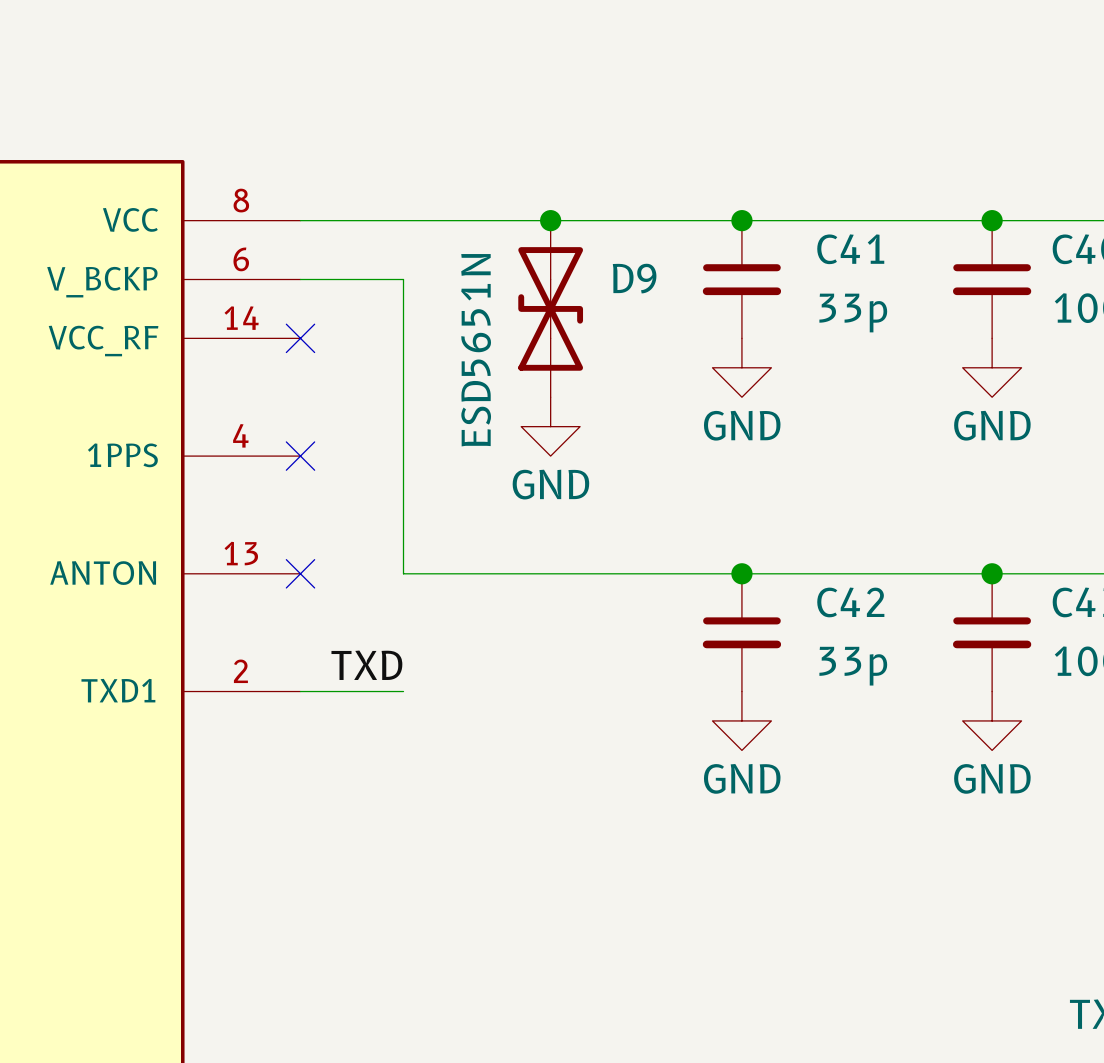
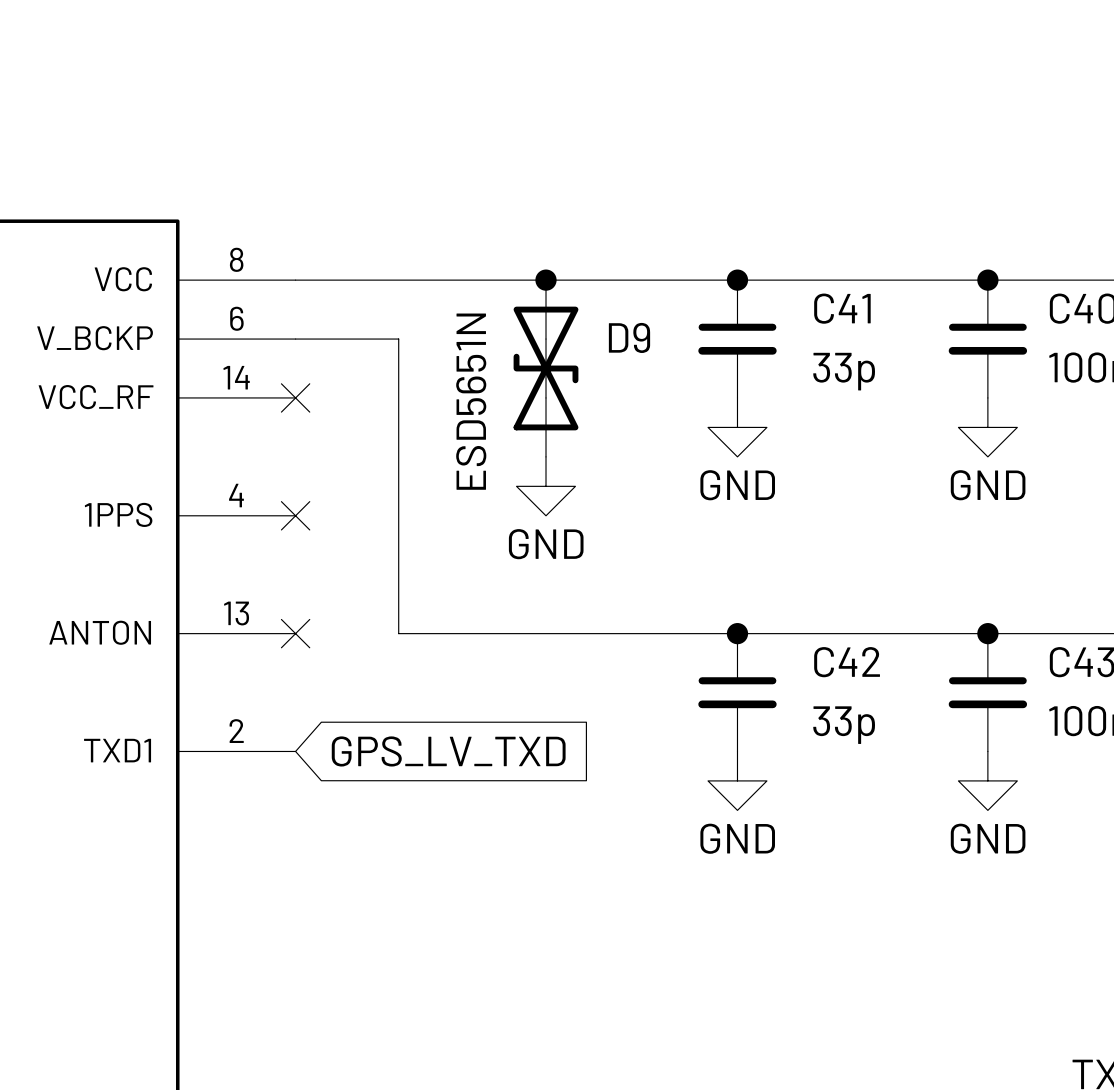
label: TXD (366, 665) -> none
wire: (300, 691) (403, 691) -> none
global label: none -> GPS_LV_TXD (448, 751)

